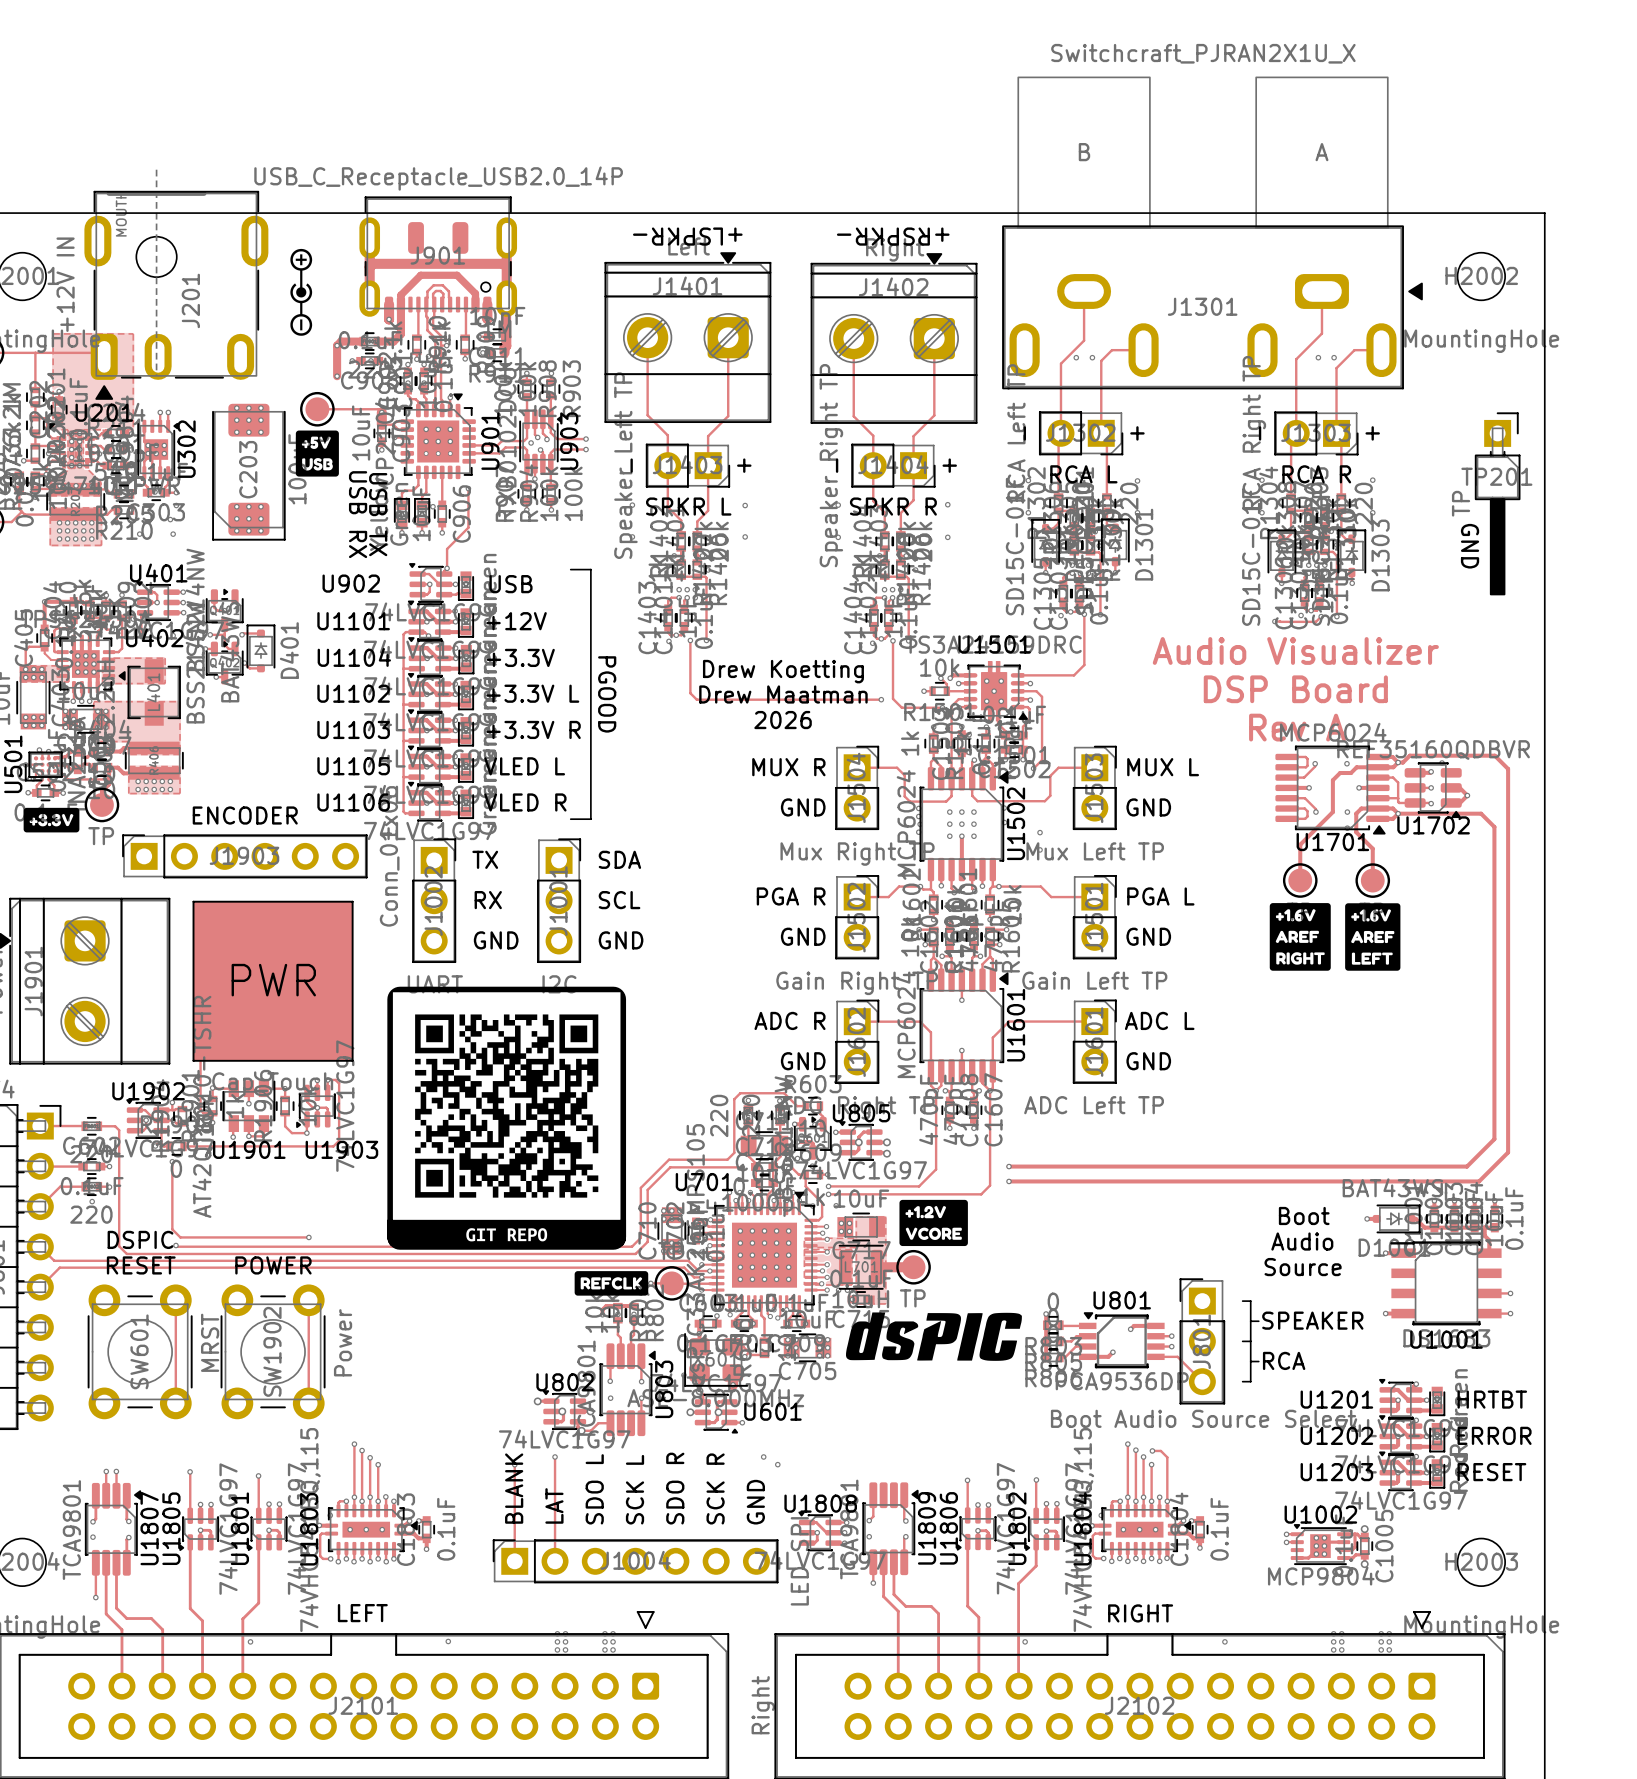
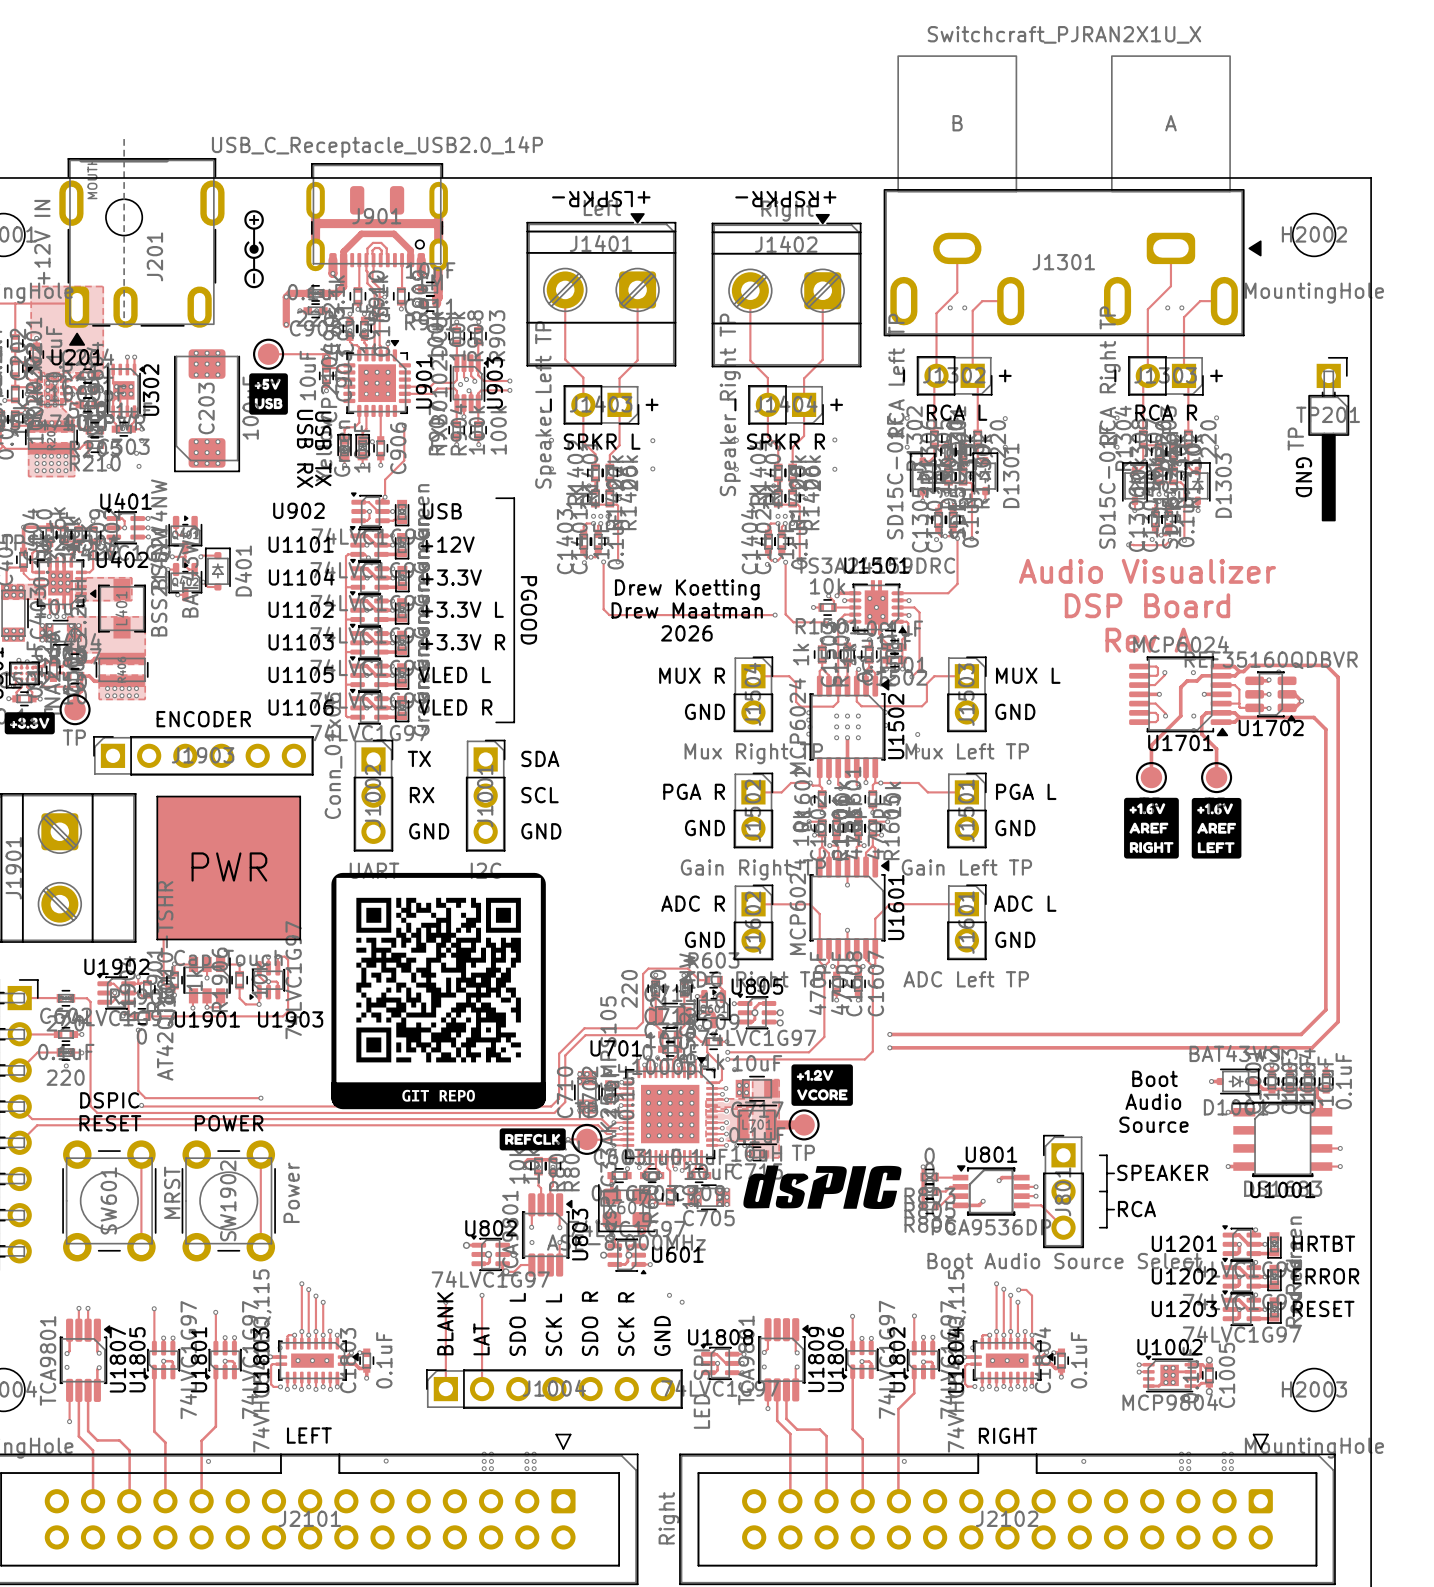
via: (1398, 762) -> none
via: (1398, 813) -> none

